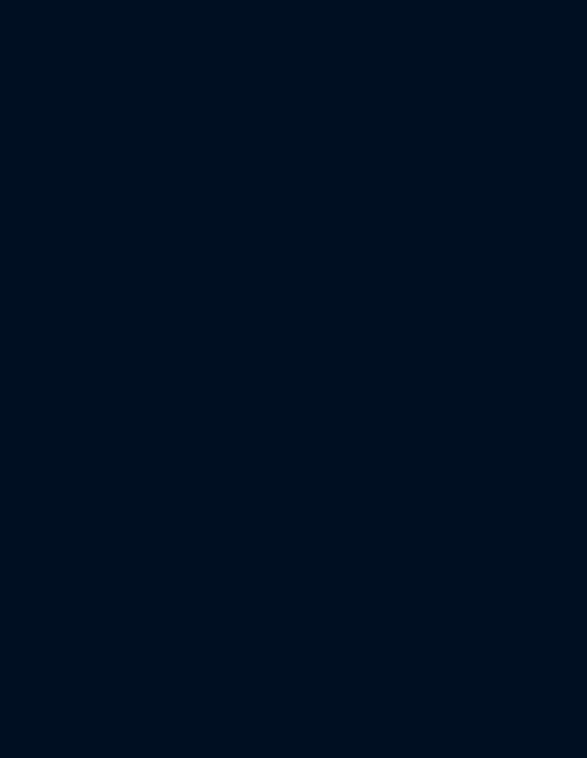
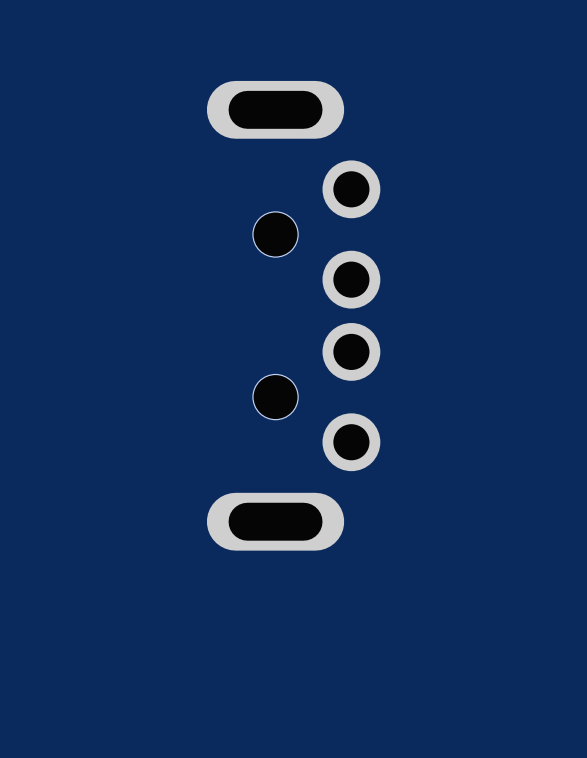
part: none -> (293, 315)

